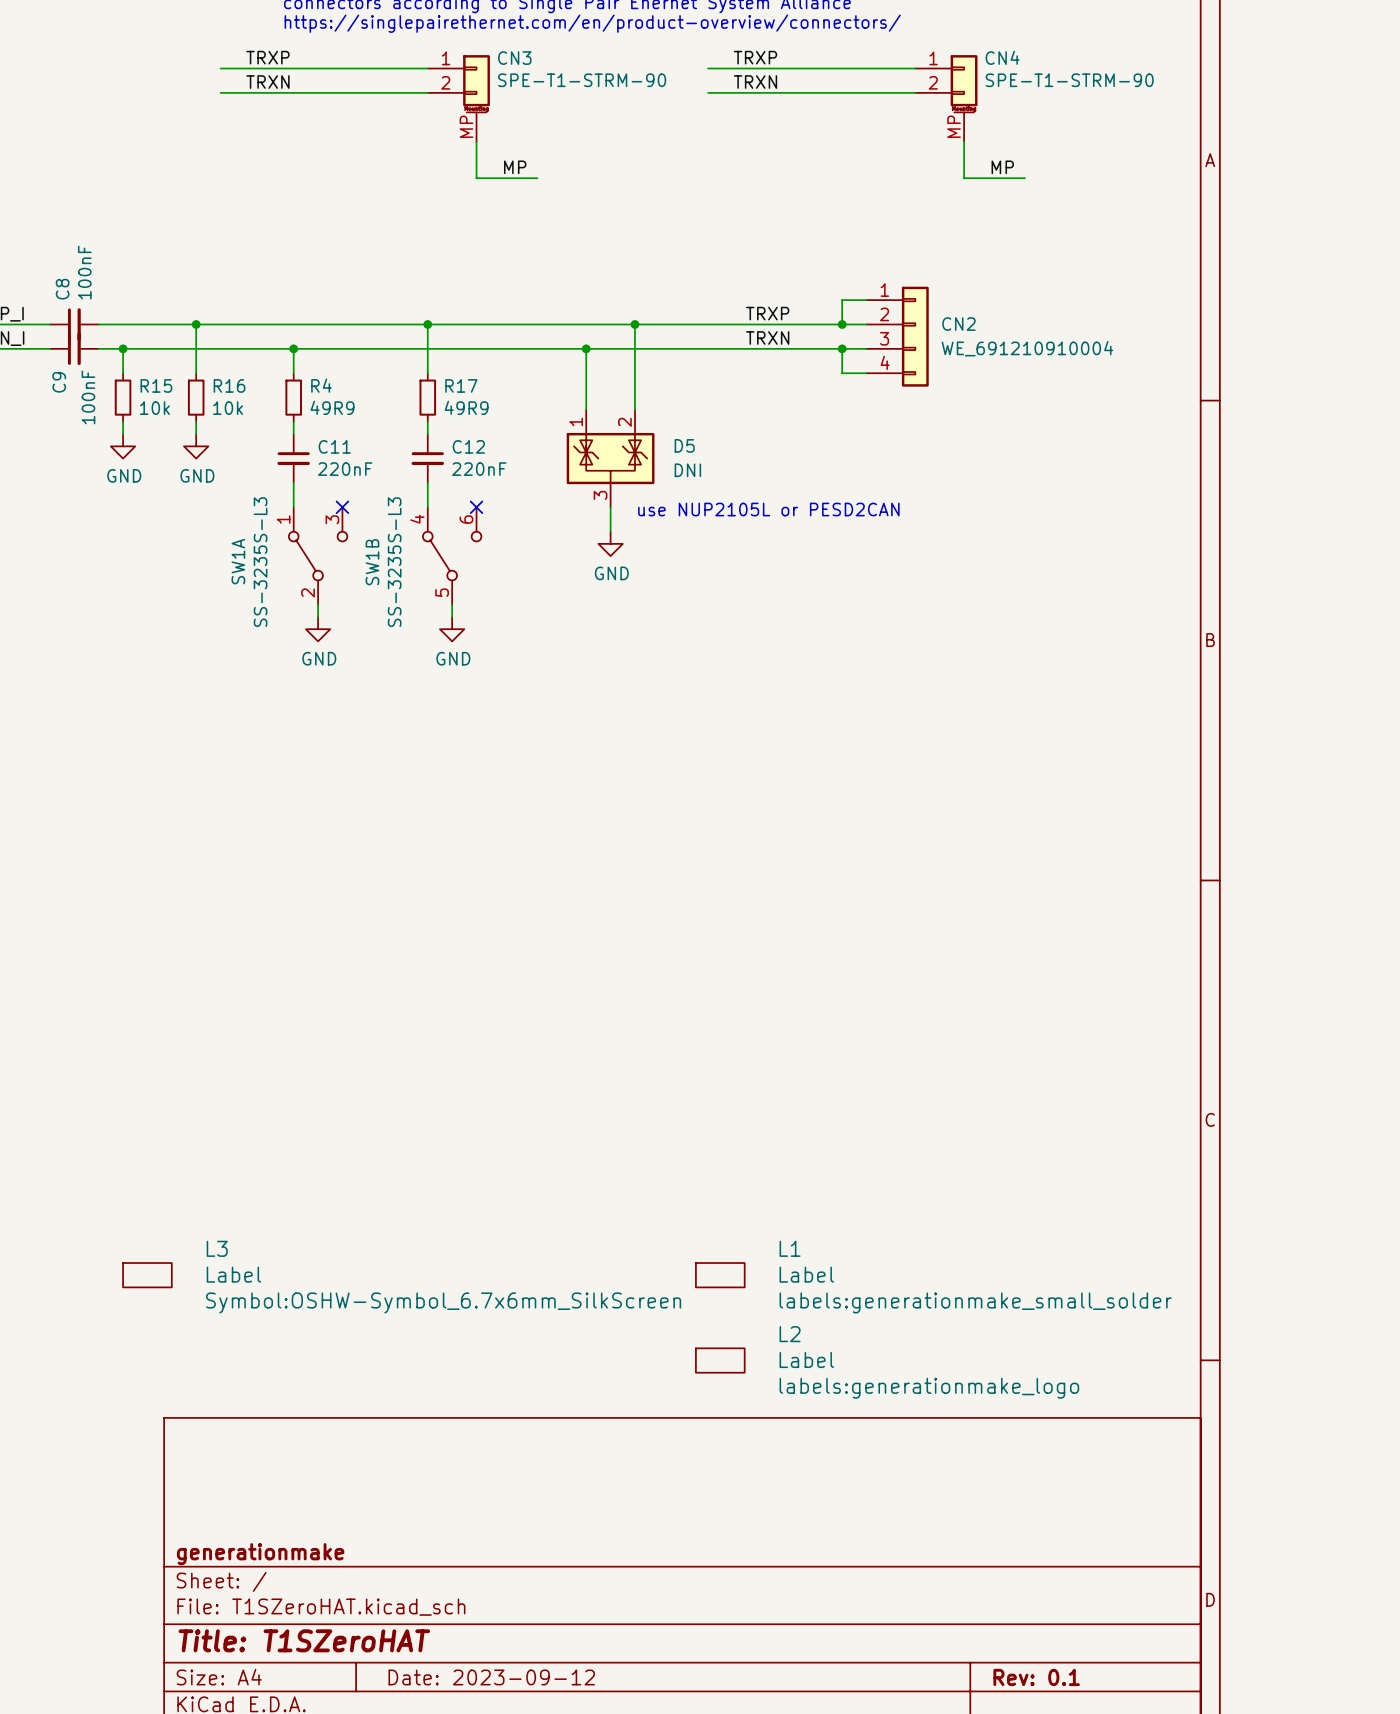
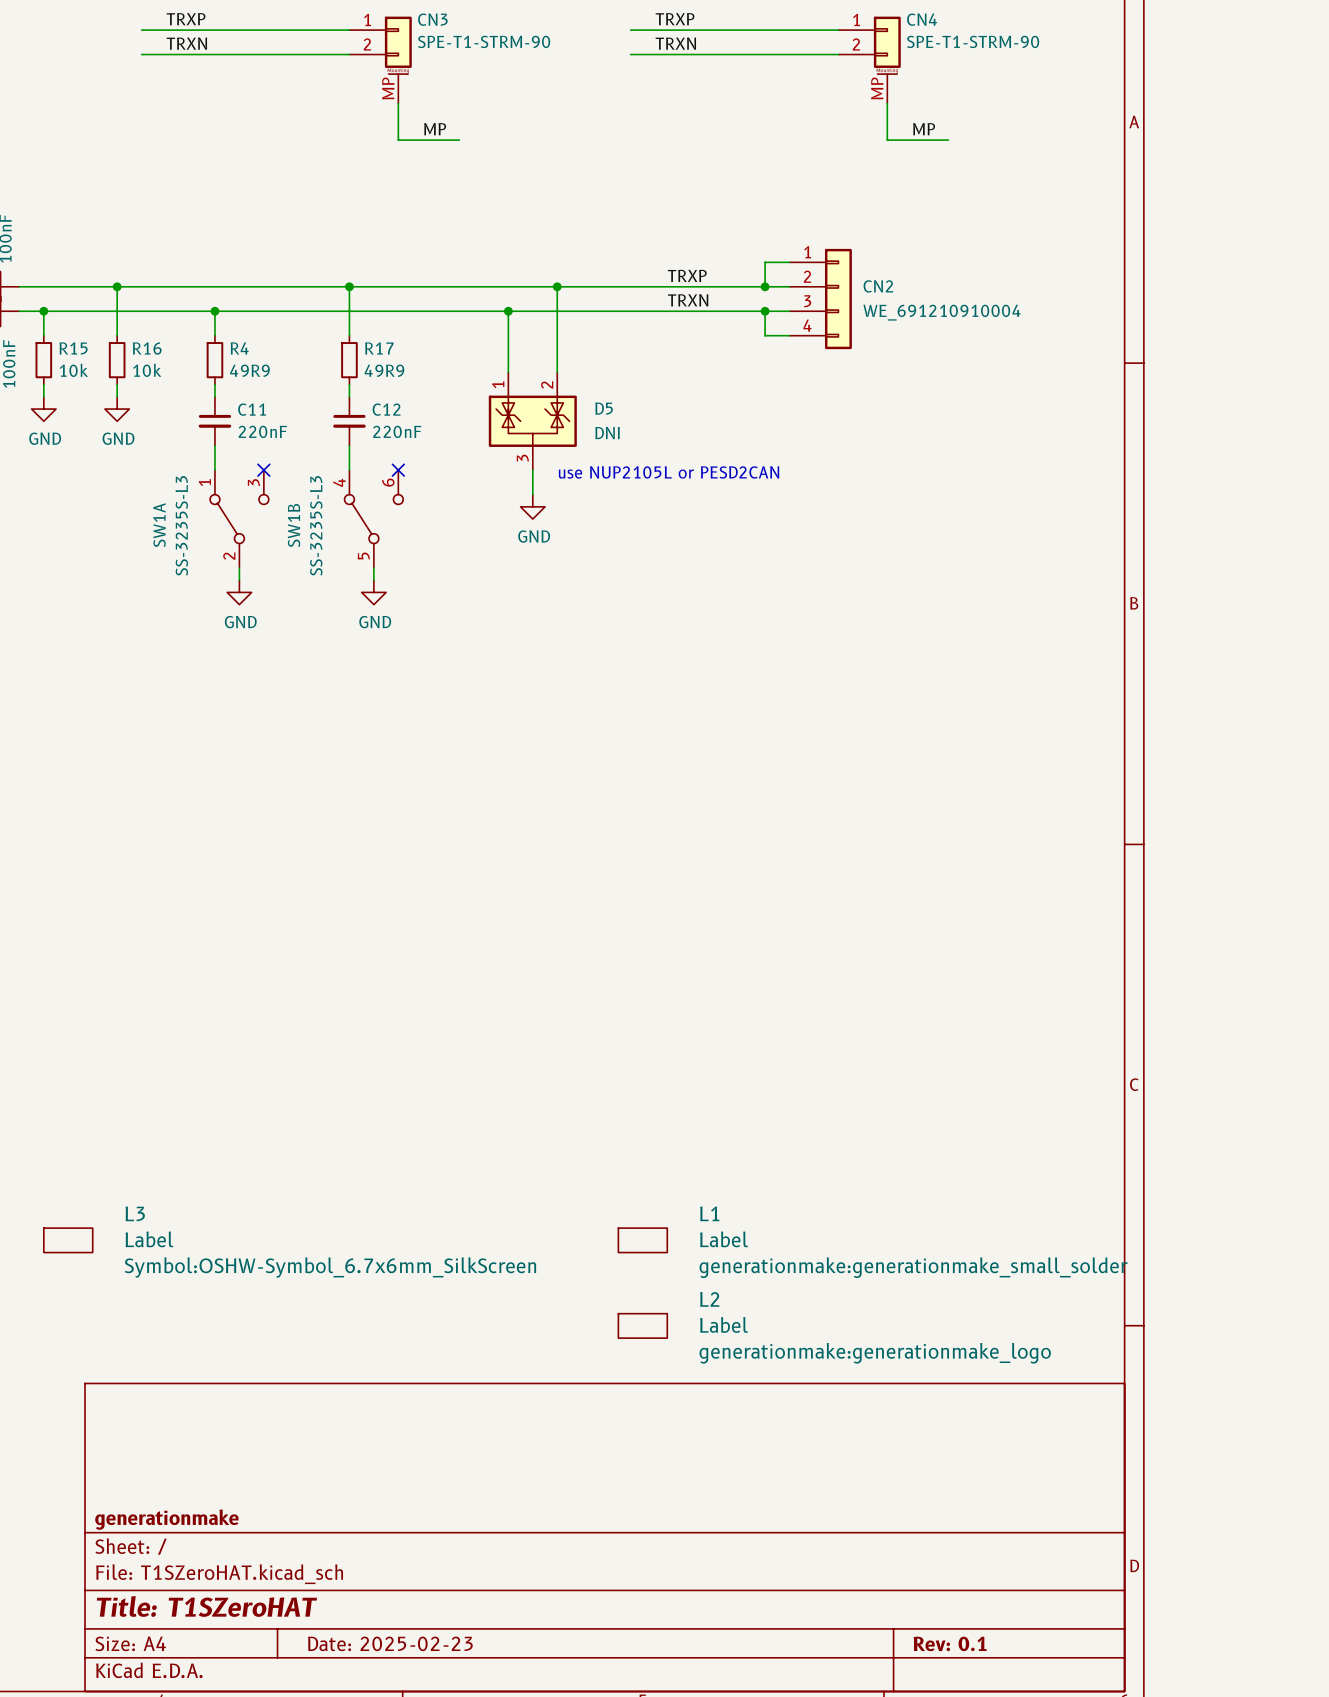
L1 text: labels:generationmake_small_solder (975, 1302) -> generationmake:generationmake_small_solder (913, 1267)
L2 text: labels:generationmake_logo (929, 1388) -> generationmake:generationmake_logo (875, 1353)
title block: Date: 2023-09-12 (491, 1677) -> Date: 2025-02-23 (390, 1643)

